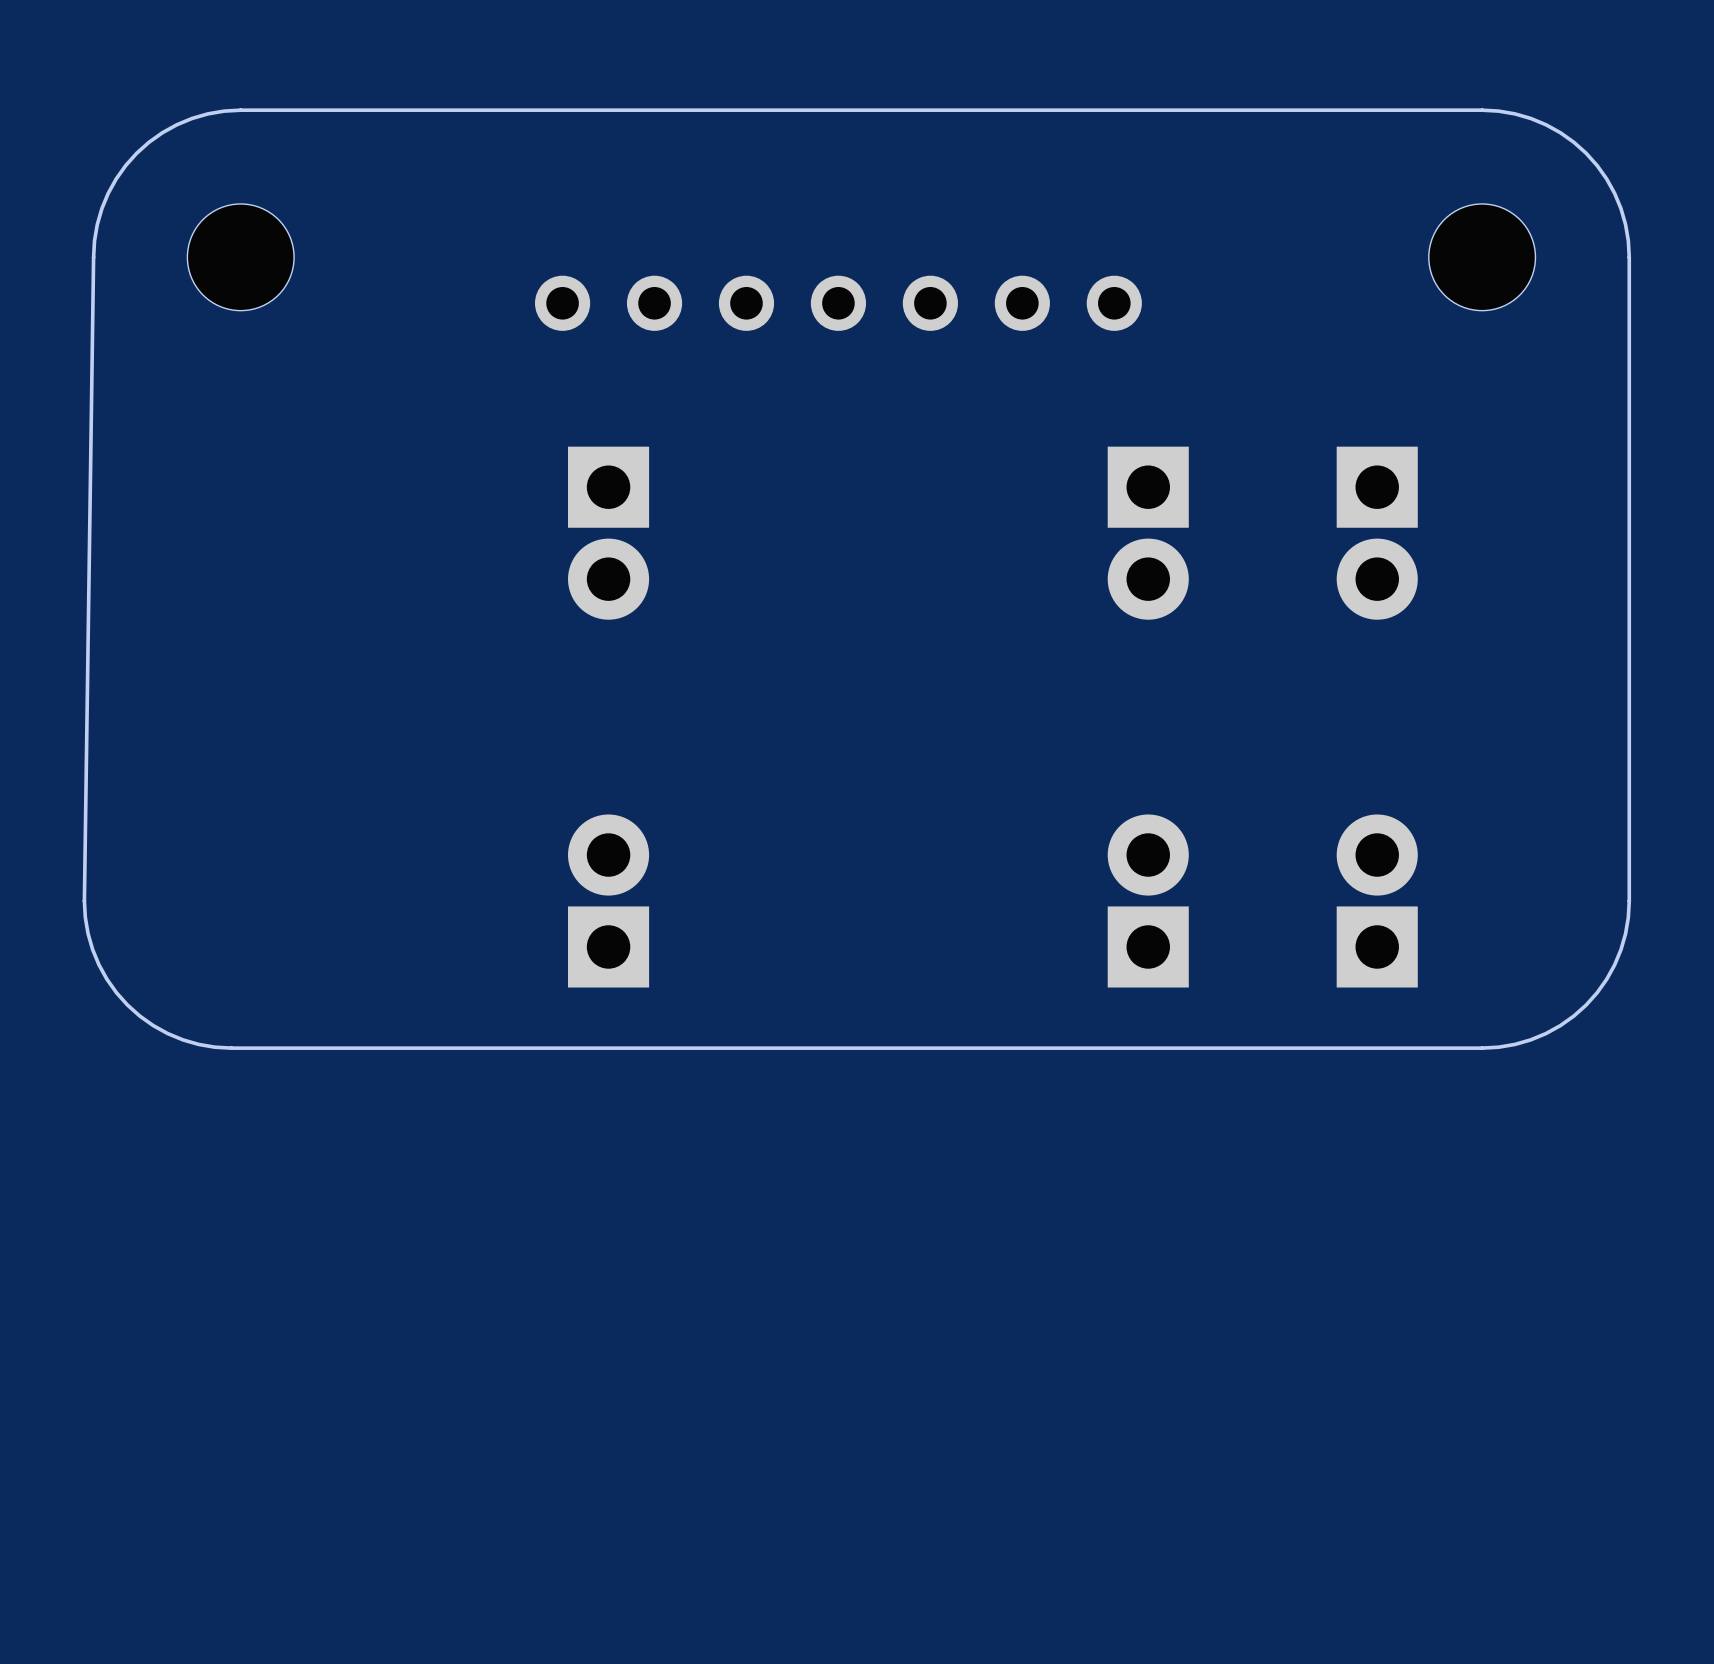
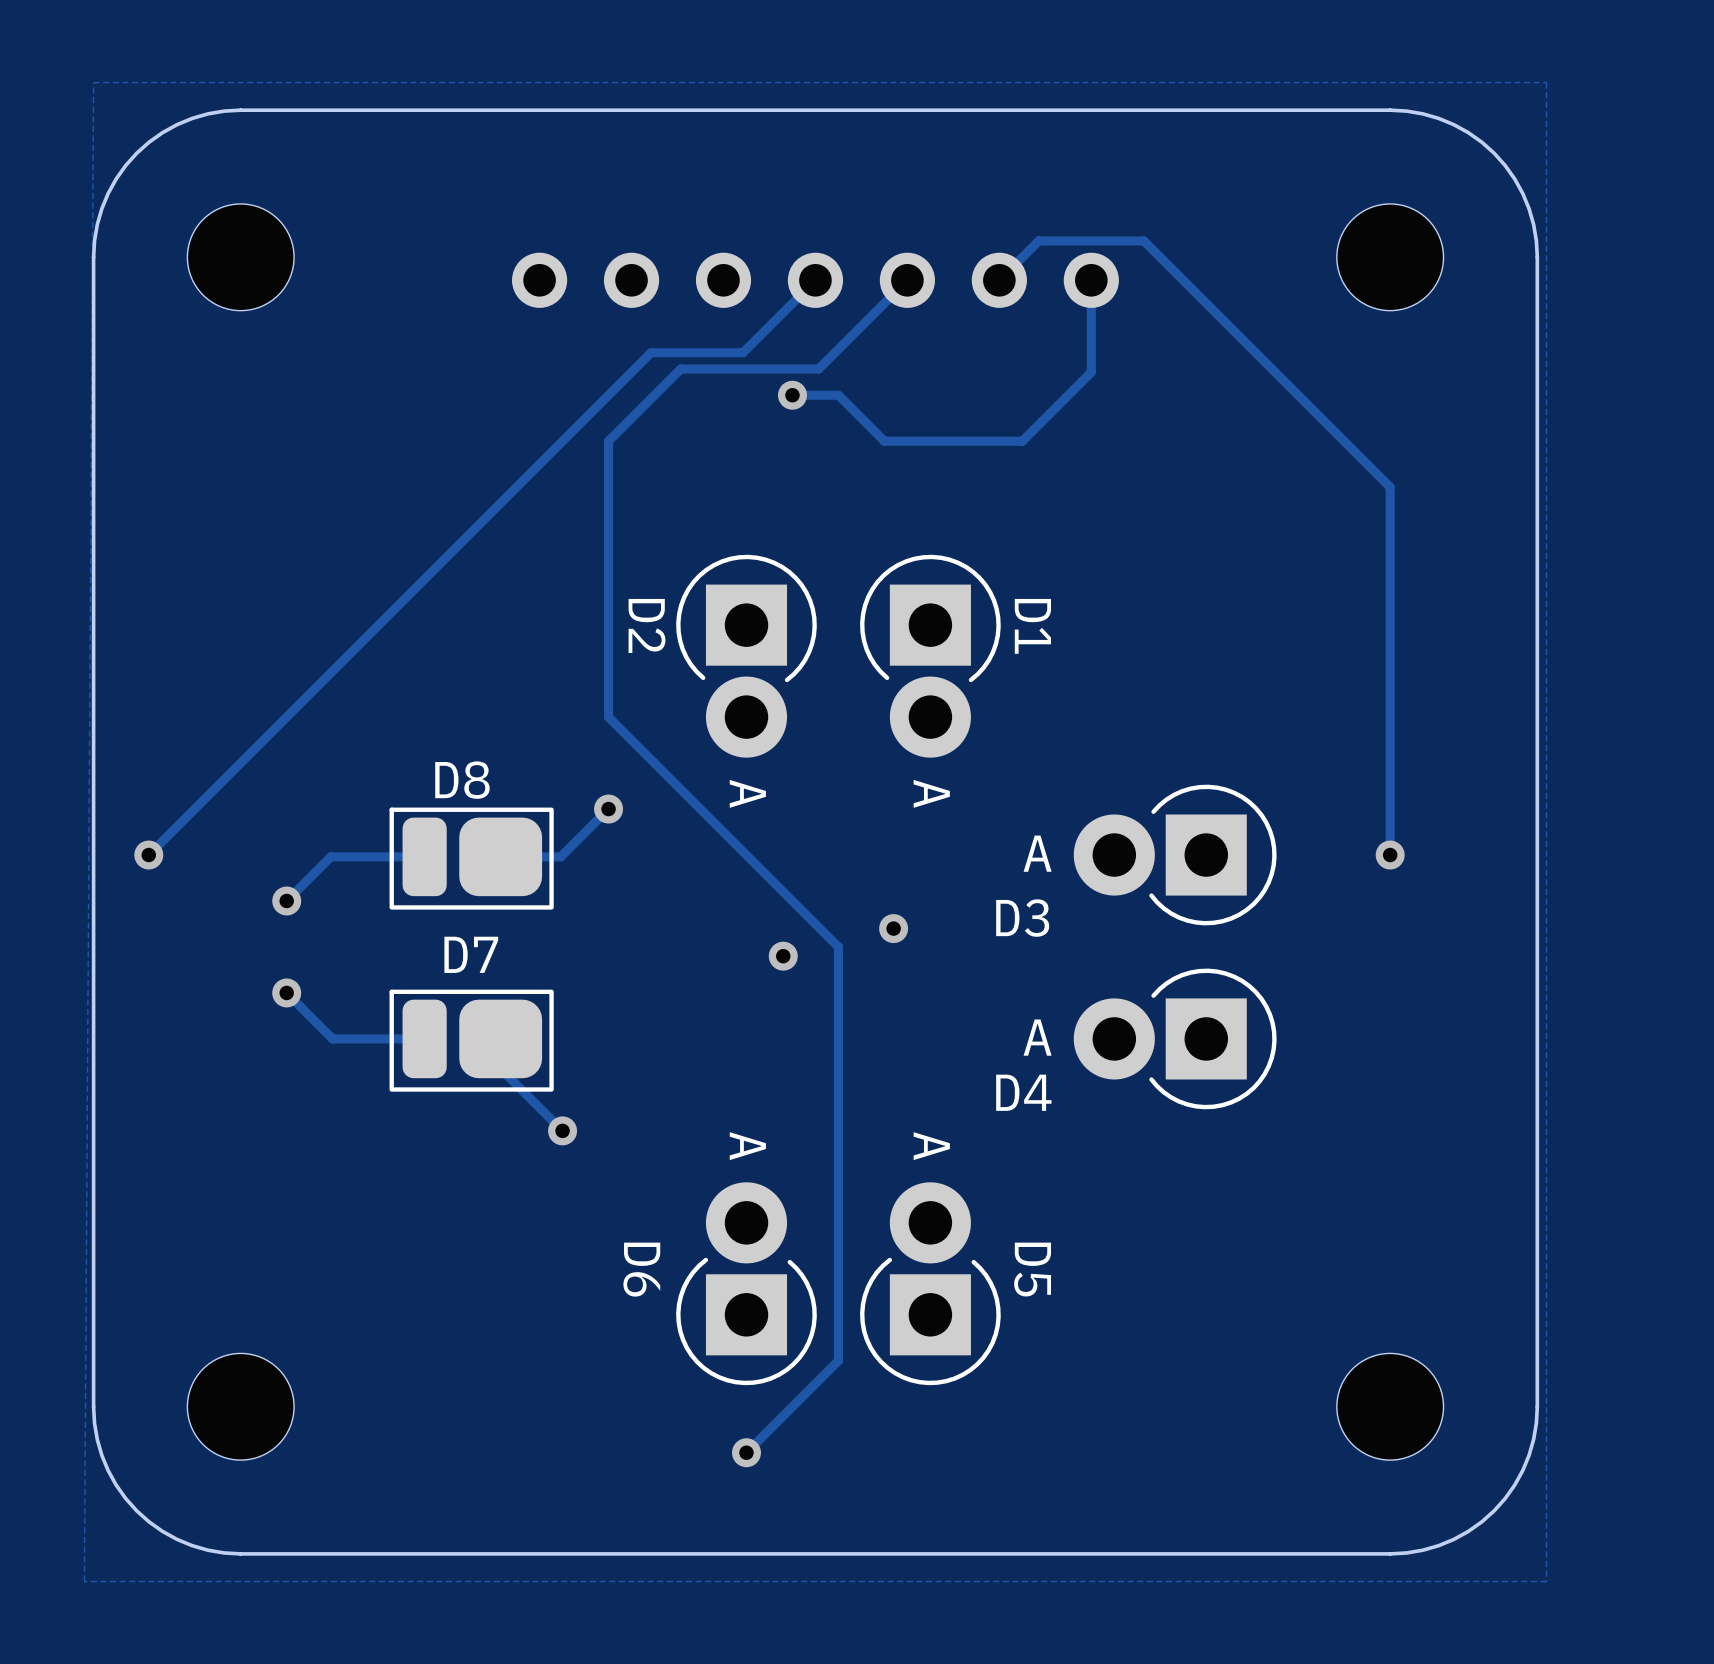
zone outline: none -> (1546, 82) (93, 82) (84, 1581) (1546, 1581) (1546, 82)
board edge: (1390, 110) (1498, 111) (1514, 113) (1545, 124) (1573, 142) (1586, 153) (1606, 179) (1621, 208) (1628, 240) (1628, 917) (1625, 933) (1614, 964) (1606, 979) (1586, 1005) (1560, 1025) (1545, 1033) (1514, 1044) (1498, 1047) (231, 1048) (198, 1044) (182, 1039) (153, 1025) (127, 1005) (106, 979) (92, 949) (85, 917) (93, 257) -> (1390, 110) (1422, 113) (1454, 124) (1468, 132) (1494, 153) (1514, 179) (1529, 208) (1533, 224) (1537, 257) (1536, 1423) (1529, 1455) (1522, 1470) (1505, 1498) (1494, 1510) (1481, 1521) (1454, 1539) (1422, 1550) (1406, 1552) (240, 1553) (207, 1550) (176, 1539) (148, 1521) (136, 1510) (116, 1485) (108, 1470) (97, 1439) (93, 1406) (93, 257)
part position: (1482, 257) -> (1390, 257)
track: none -> (815, 280) (743, 352) (651, 352) (148, 855)
track: none -> (907, 280) (818, 369) (680, 369) (608, 441) (608, 717) (838, 946) (838, 1360) (746, 1452)
track: none -> (999, 280) (1038, 240) (1143, 240) (1390, 487) (1390, 855)
track: none -> (1091, 280) (1091, 372) (1022, 441) (884, 441) (838, 395) (792, 395)
part position: (838, 303) -> (815, 280)
via: none -> (792, 395)
D6 side: top (608, 533) -> bottom (746, 1283)
D4 side: top (1148, 533) -> bottom (1175, 1038)
D2 side: top (1377, 533) -> bottom (746, 656)
track: none -> (608, 809) (560, 856) (500, 856)
via: none -> (608, 809)
via: none -> (148, 855)
via: none -> (1390, 855)
track: none -> (424, 856) (330, 856) (286, 901)
D8: none -> (471, 858)
via: none -> (286, 901)
D5 side: top (608, 901) -> bottom (930, 1283)
D3 side: top (1148, 901) -> bottom (1175, 855)
D1 side: top (1377, 901) -> bottom (930, 656)
via: none -> (893, 928)
via: none -> (783, 956)
track: none -> (286, 992) (332, 1038) (424, 1038)
via: none -> (286, 992)
track: none -> (500, 1038) (500, 1068) (562, 1130)
D7: none -> (471, 1040)
via: none -> (562, 1130)
part: none -> (240, 1406)
part: none -> (1390, 1406)
via: none -> (746, 1452)

